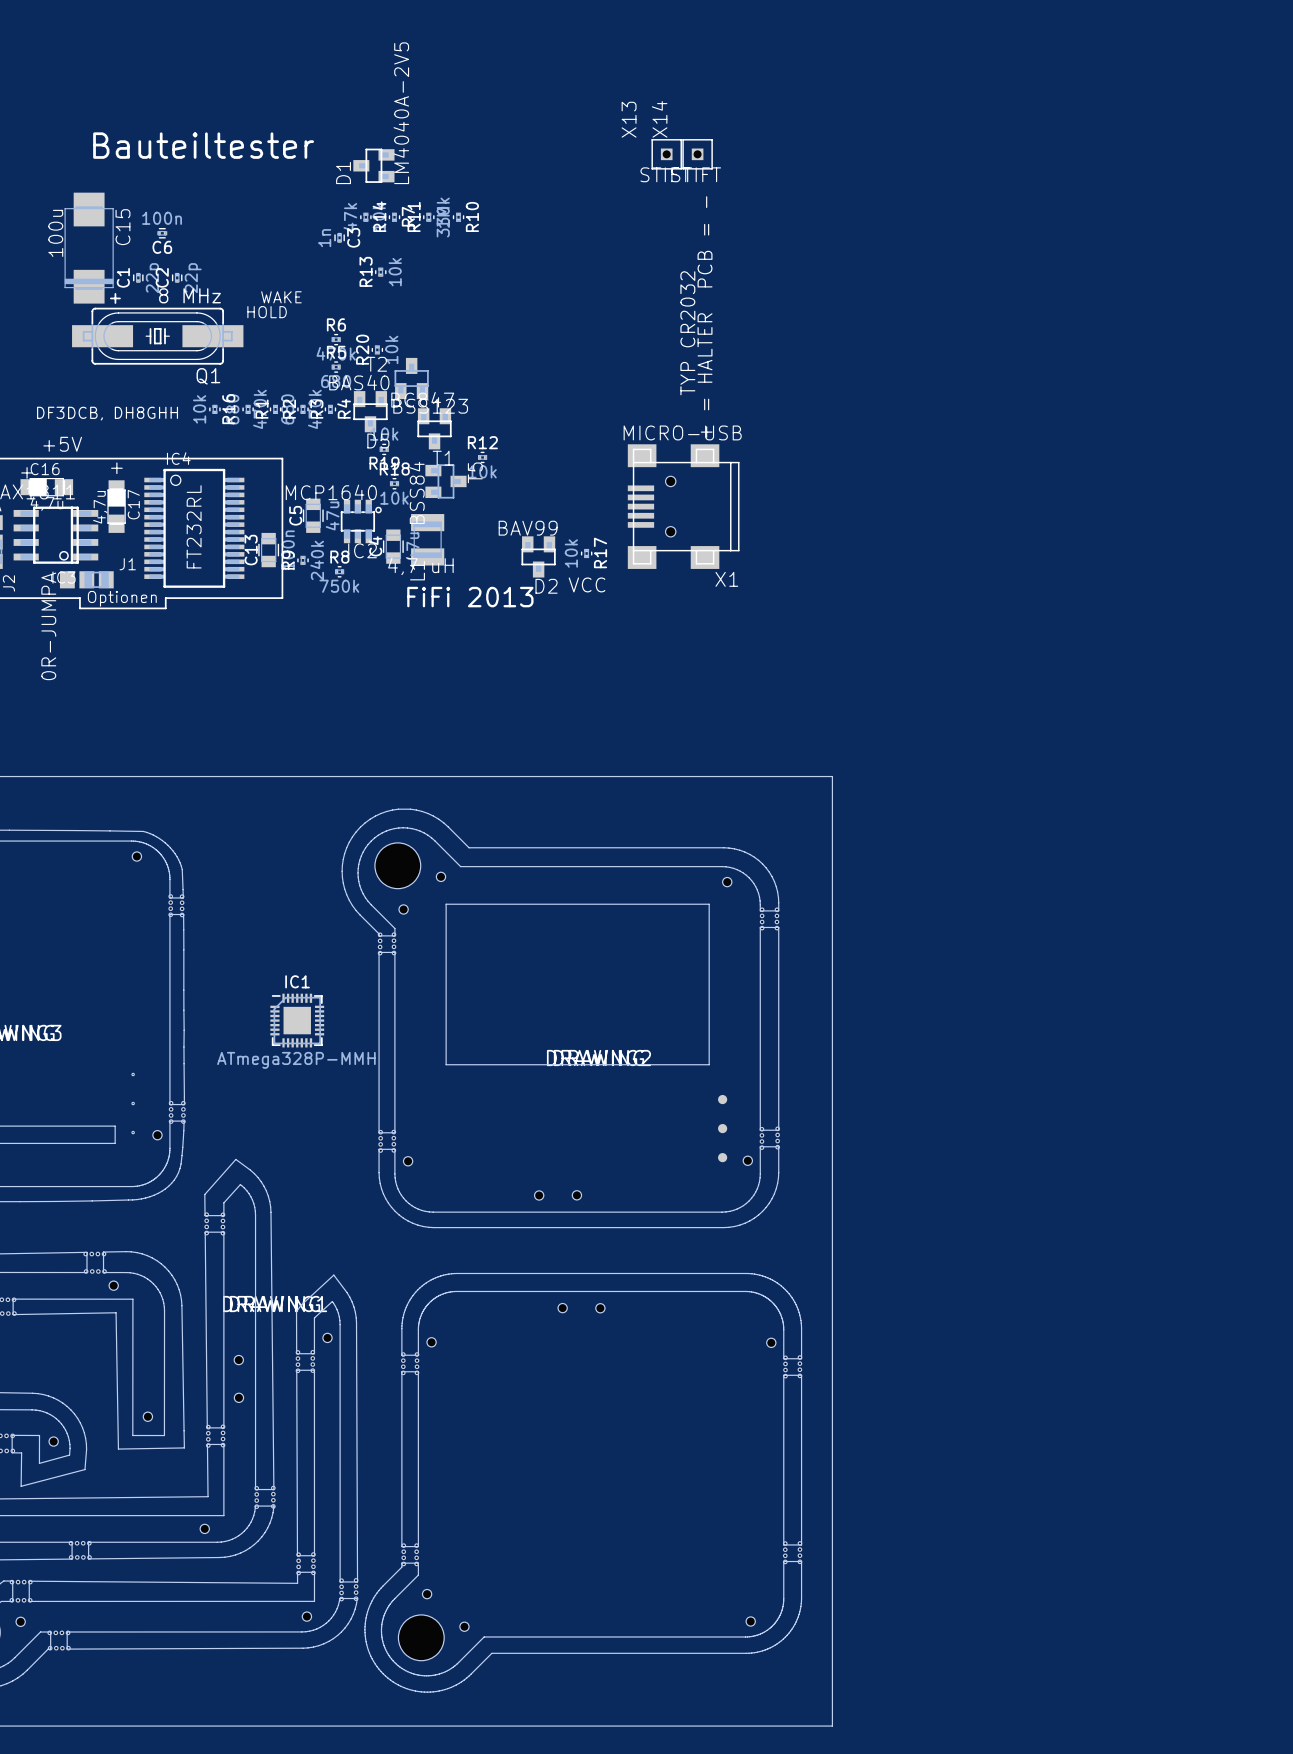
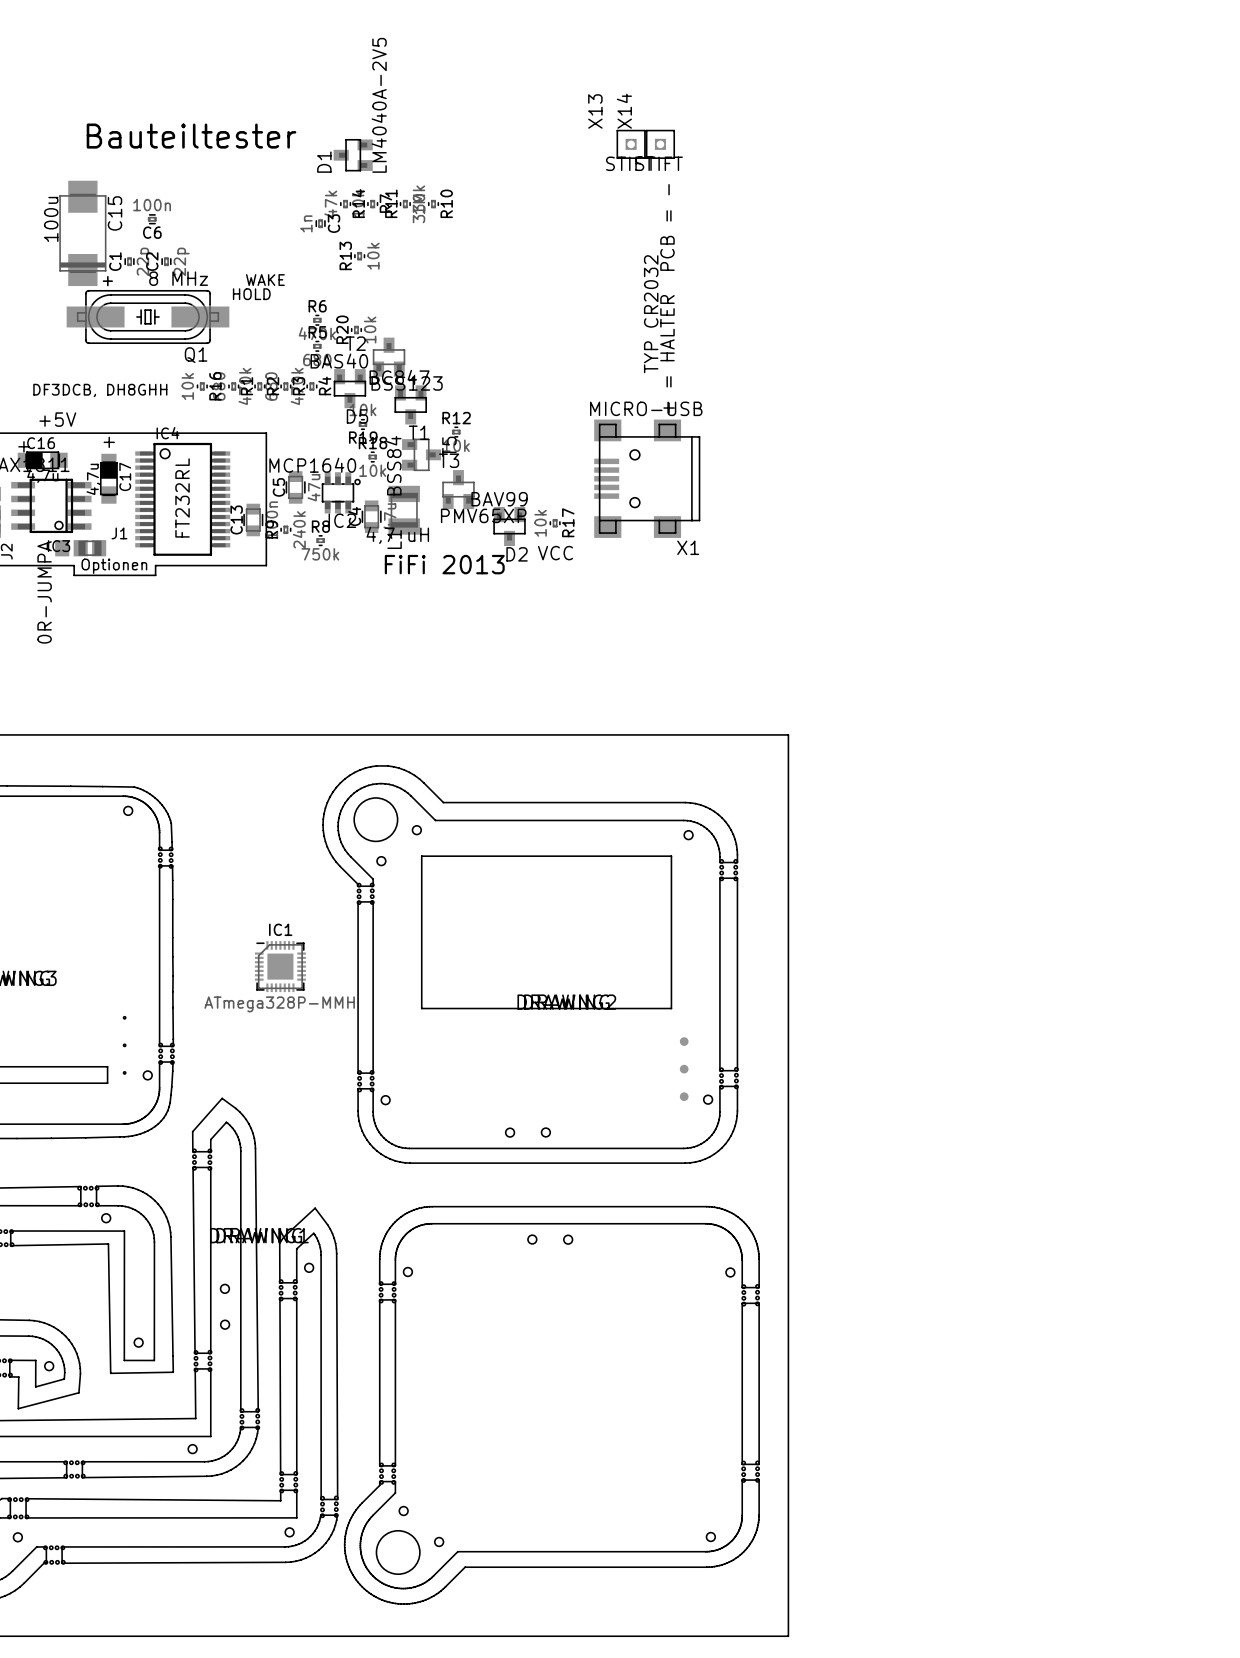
T3: none -> PMV65XP (458, 489)

